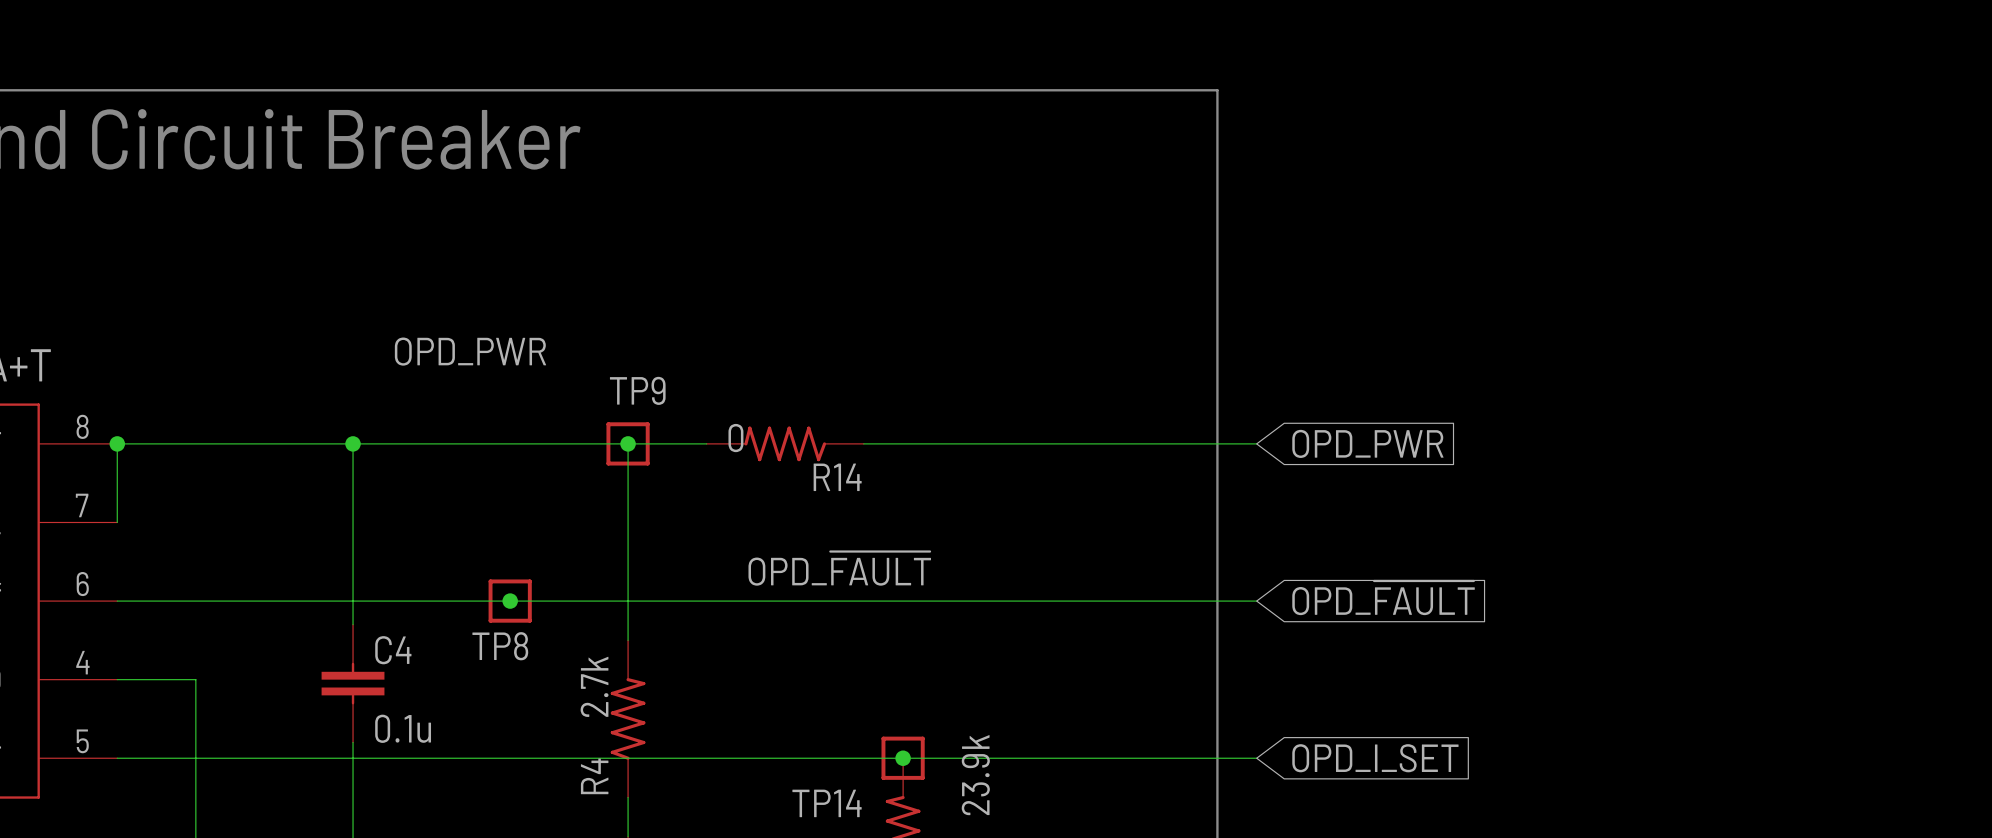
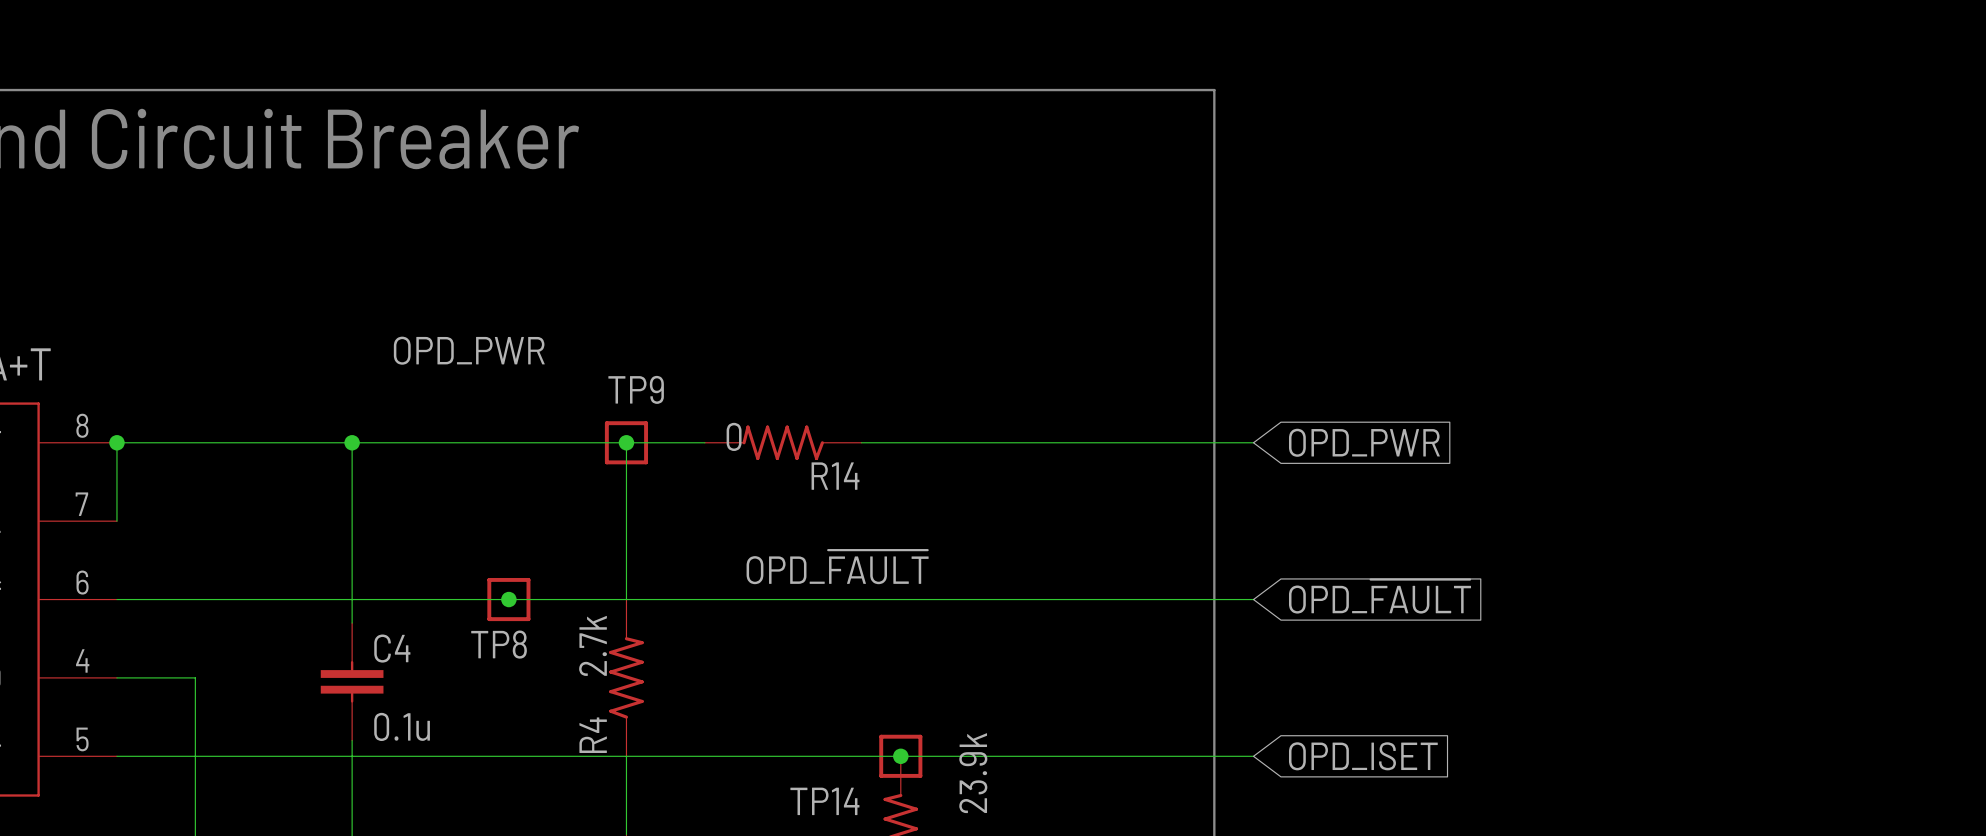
R4 position: (628, 718) -> (626, 677)
global label: OPD_I_SET (1375, 758) -> OPD_ISET (1363, 756)

